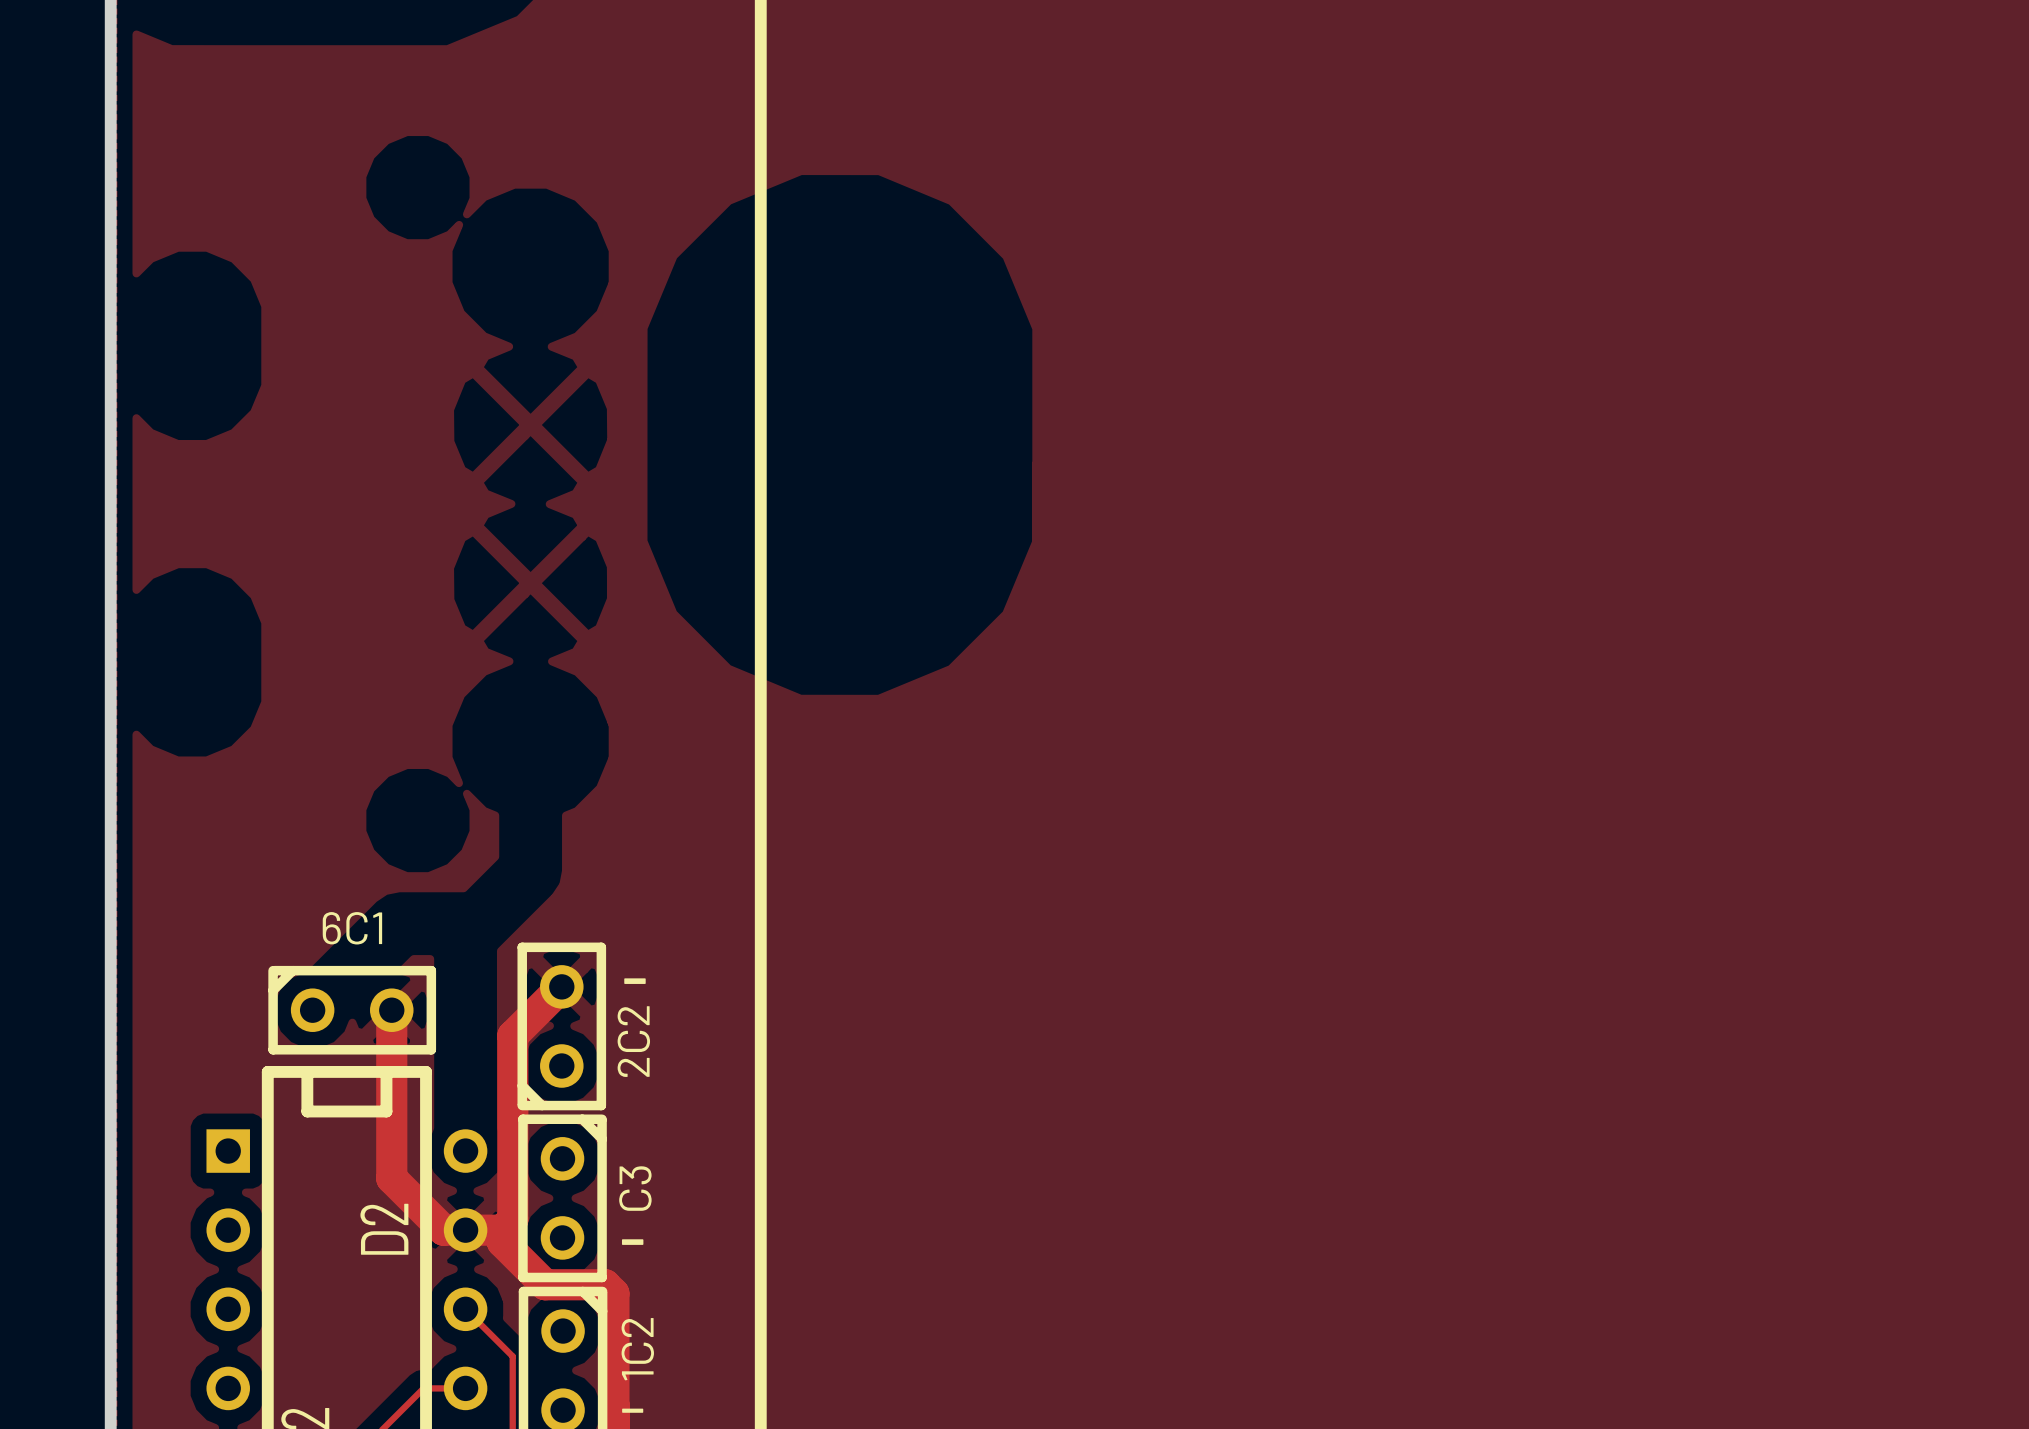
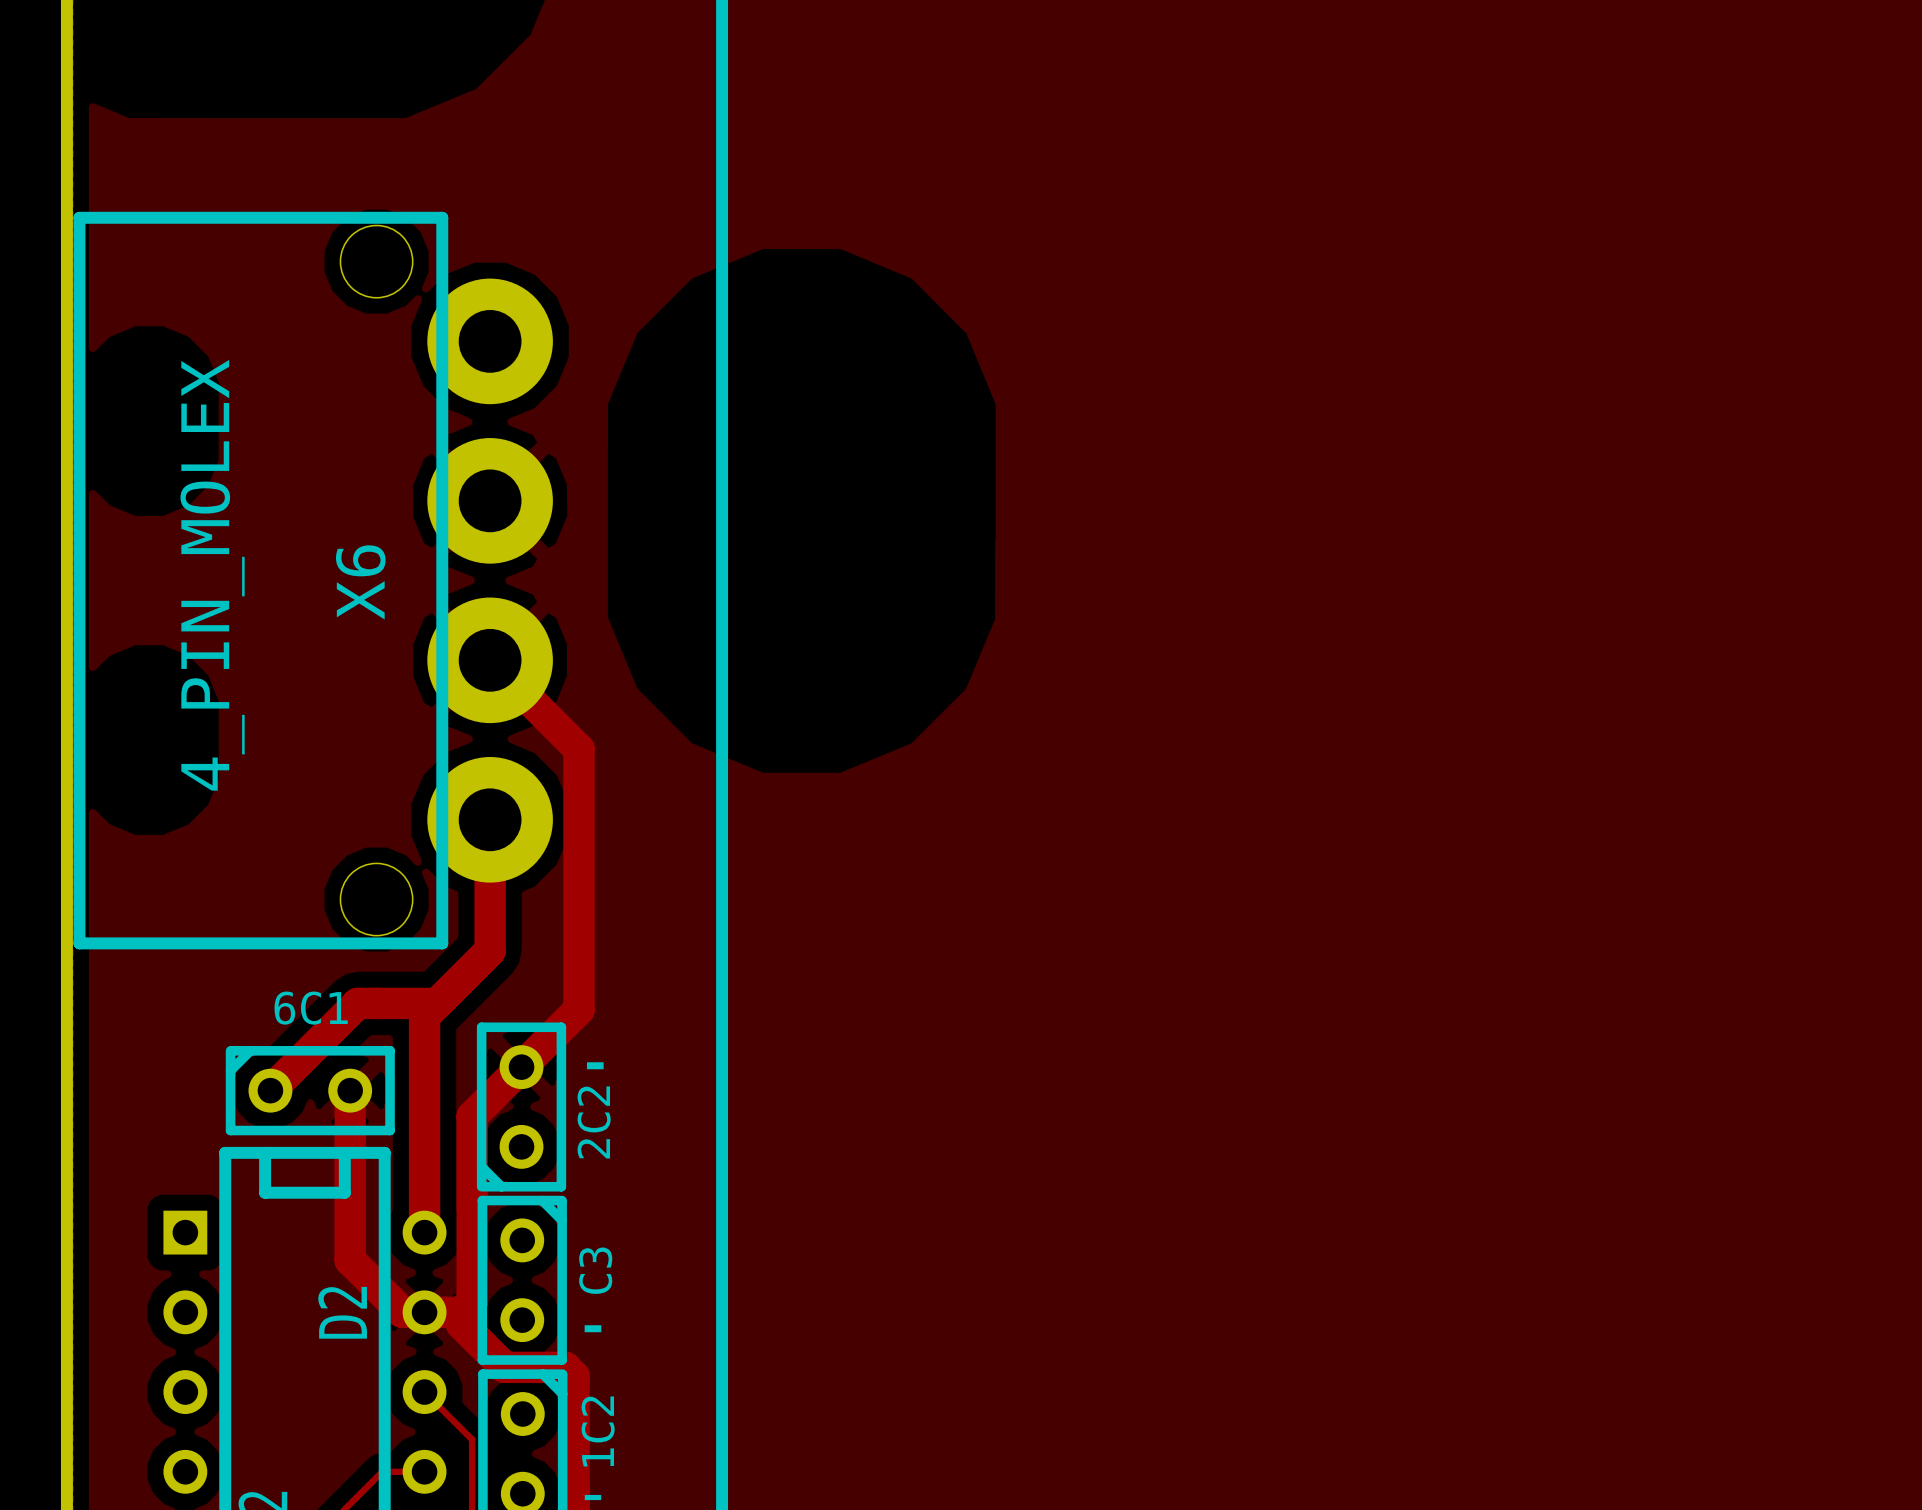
X6: none -> 4_PIN_MOLEX (313, 580)
track: none -> (490, 660) (579, 749) (579, 1009) (521, 1067)
track: none -> (490, 819) (490, 950) (424, 1016) (424, 1232)
track: none -> (437, 1003) (357, 1003) (270, 1090)

